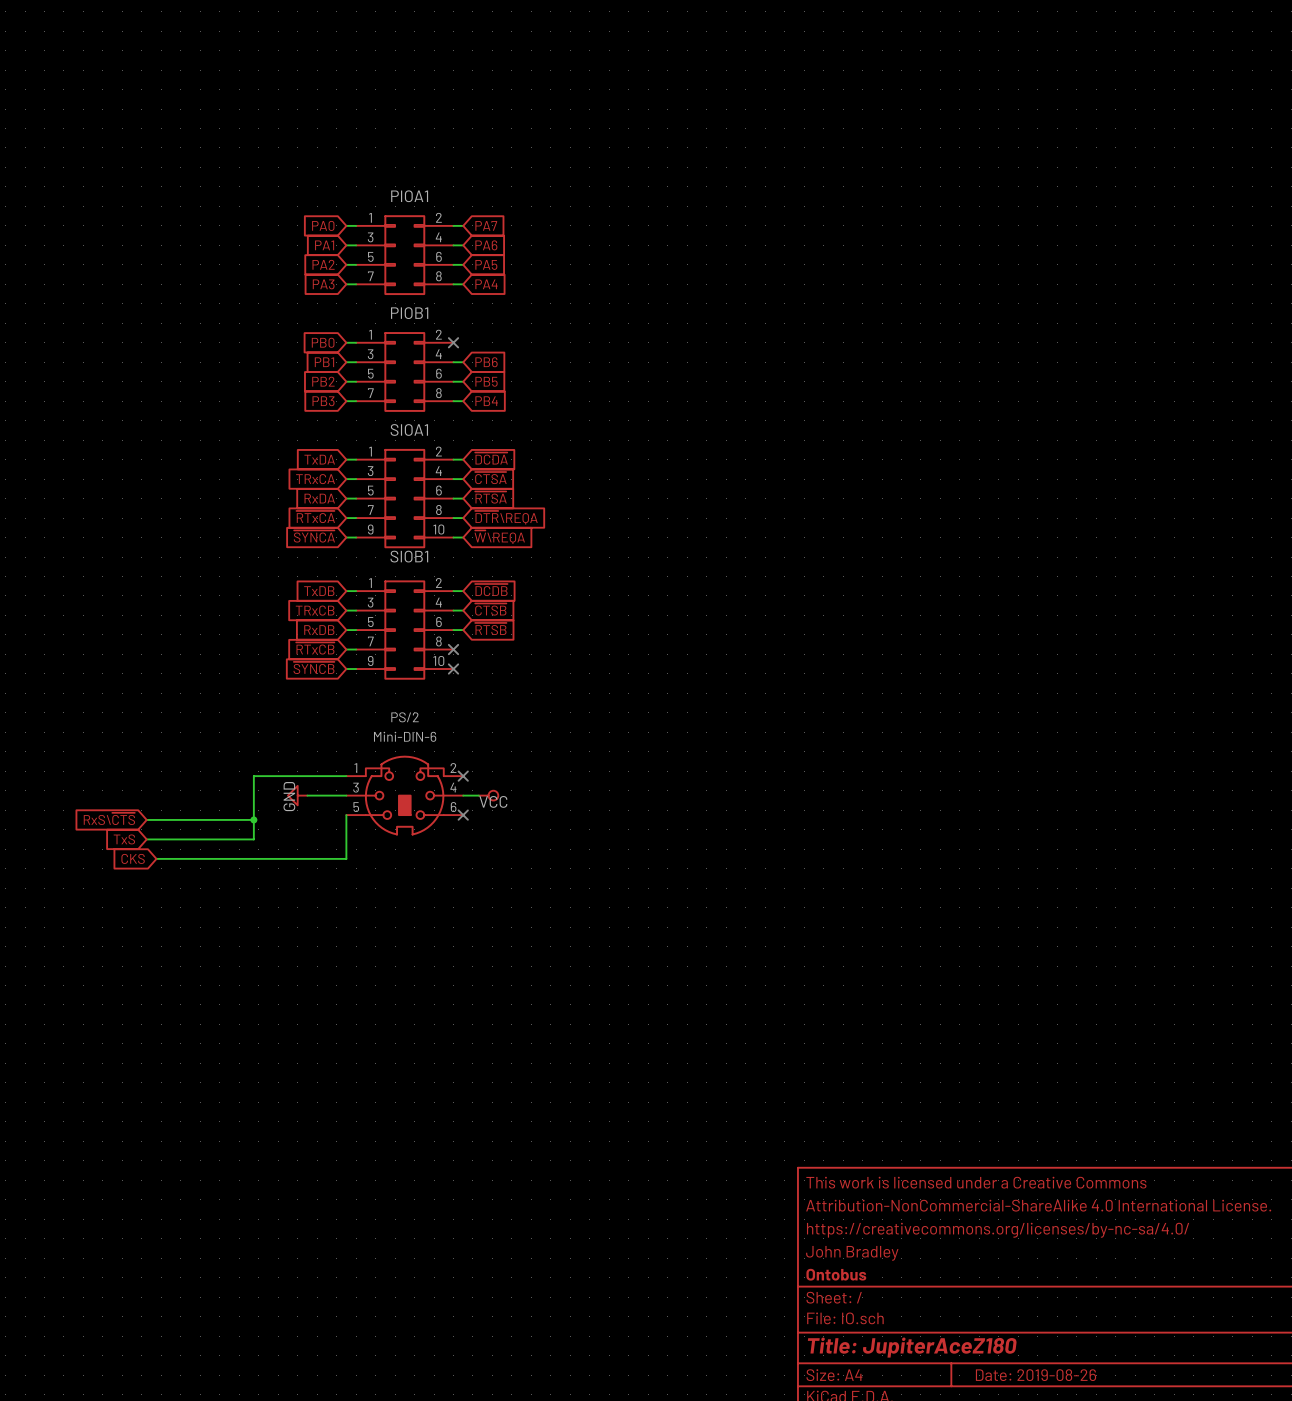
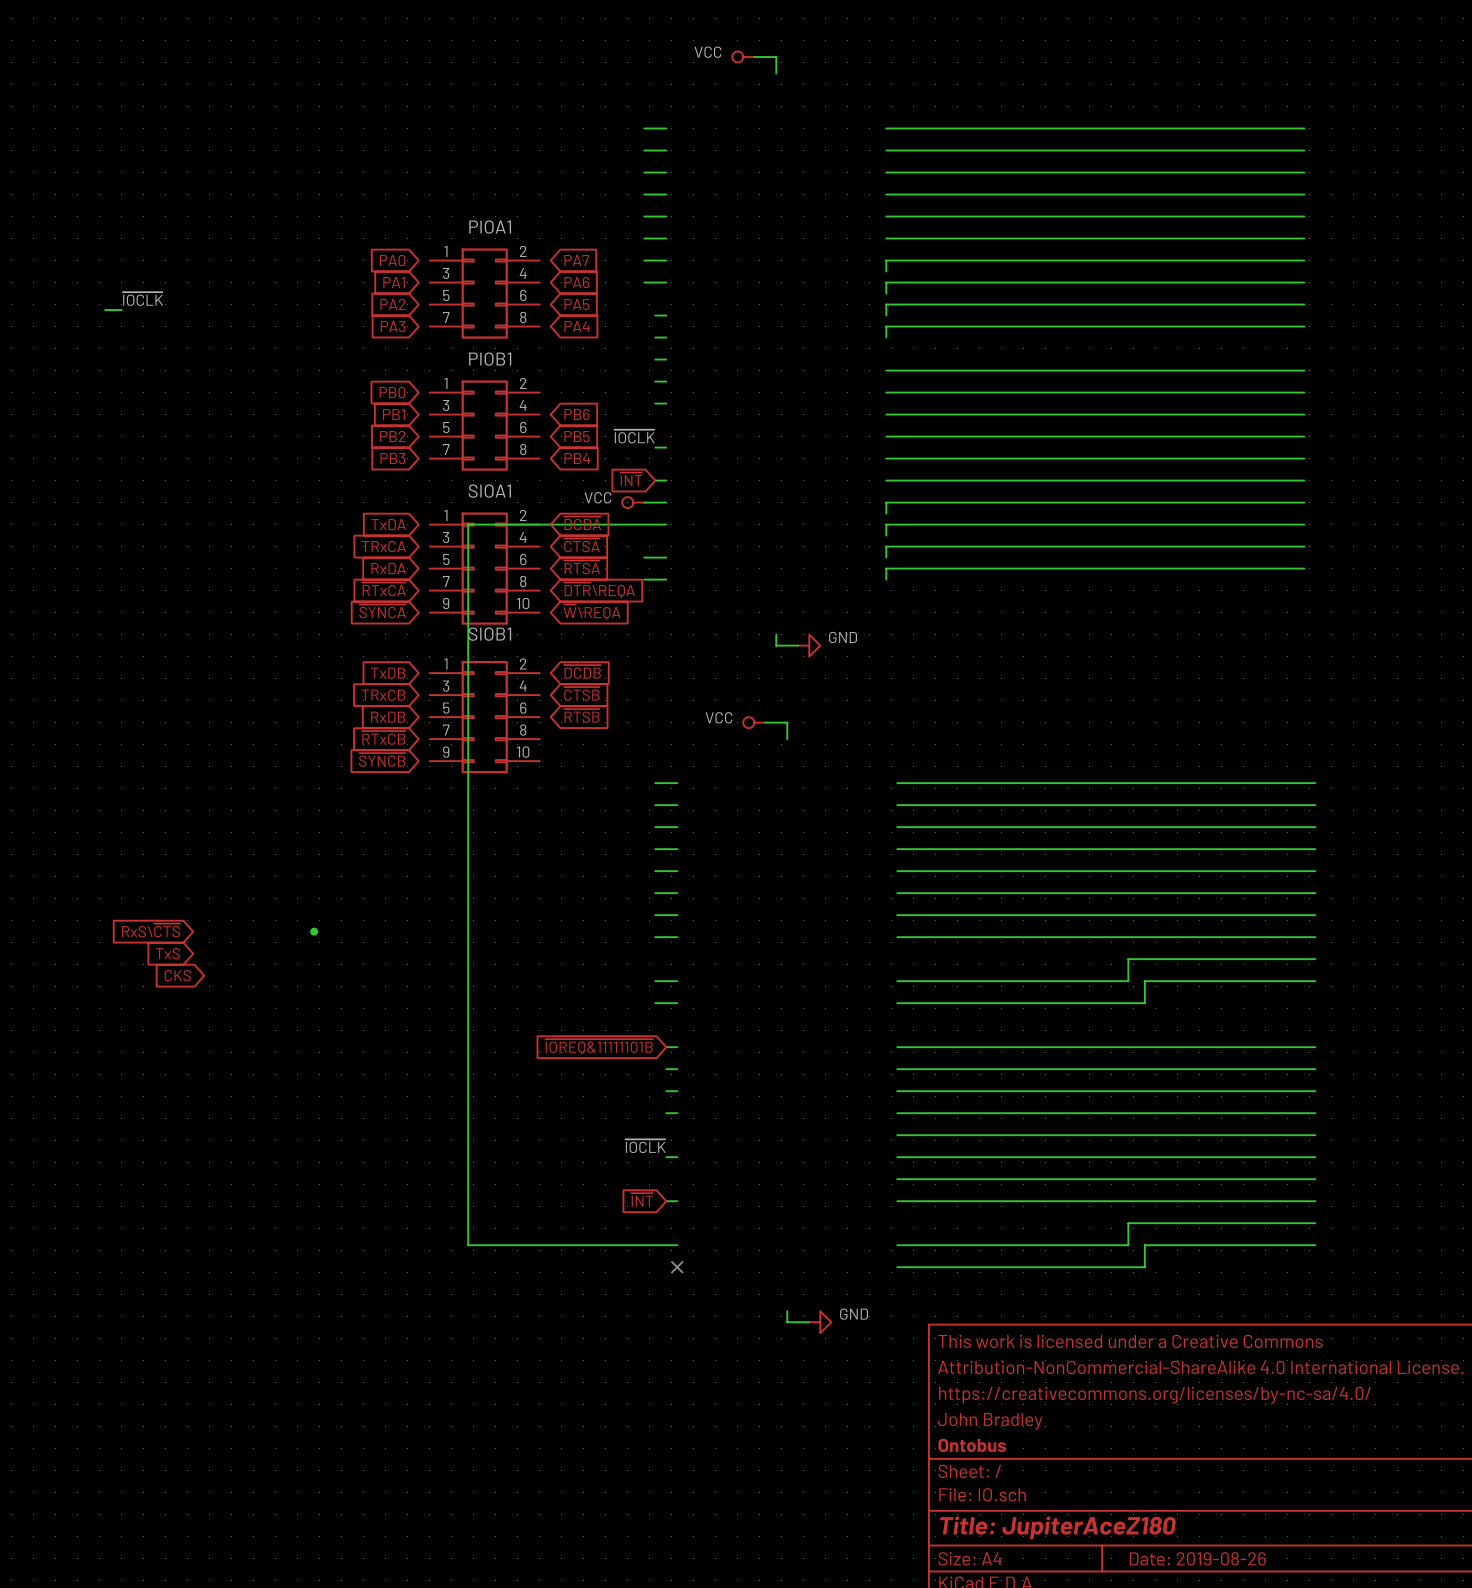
power symbol: none -> VCC (743, 56)
wire: none -> (754, 56) (776, 56) (776, 73)
wire: none -> (644, 128) (666, 128)
wire: none -> (886, 128) (1304, 128)
wire: none -> (644, 150) (666, 150)
wire: none -> (886, 150) (1304, 150)
wire: none -> (644, 172) (666, 172)
wire: none -> (886, 172) (1304, 172)
wire: none -> (644, 194) (666, 194)
wire: none -> (886, 194) (1304, 194)
wire: none -> (644, 216) (666, 216)
wire: none -> (886, 216) (1304, 216)
wire: none -> (644, 238) (666, 238)
wire: none -> (886, 238) (1304, 238)
wire: (346, 225) (356, 225) -> none
wire: (453, 225) (463, 225) -> none
wire: none -> (644, 260) (666, 260)
wire: none -> (1304, 260) (886, 260) (886, 271)
wire: (346, 245) (356, 245) -> none
wire: (453, 245) (463, 245) -> (655, 315) (666, 315)
wire: none -> (644, 282) (666, 282)
wire: none -> (1304, 282) (886, 282) (886, 293)
label: none -> ~{IOCLK} (142, 299)
wire: (346, 264) (356, 264) -> none
wire: (453, 264) (463, 264) -> (655, 337) (666, 337)
wire: none -> (1304, 304) (886, 304) (886, 315)
wire: none -> (105, 310) (121, 310)
wire: (346, 284) (356, 284) -> none
wire: (453, 284) (463, 284) -> (655, 359) (666, 359)
wire: none -> (1304, 326) (886, 326) (886, 337)
wire: none -> (886, 370) (1304, 370)
wire: (346, 342) (356, 342) -> none
no-connect mark: (453, 342) -> none
wire: none -> (886, 392) (1304, 392)
wire: (346, 362) (356, 362) -> none
wire: (453, 362) (463, 362) -> (655, 447) (666, 447)
wire: none -> (886, 414) (1304, 414)
wire: (346, 381) (356, 381) -> none
wire: (453, 381) (463, 381) -> (655, 381) (666, 381)
label: none -> ~{IOCLK} (634, 436)
wire: none -> (886, 436) (1304, 436)
wire: (346, 401) (356, 401) -> none
wire: (453, 401) (463, 401) -> (655, 403) (666, 403)
wire: none -> (886, 458) (1304, 458)
global label: none -> ~{INT} (631, 479)
wire: none -> (886, 480) (1304, 480)
power symbol: none -> VCC (633, 502)
wire: none -> (644, 502) (666, 502)
wire: none -> (1304, 502) (886, 502) (886, 513)
wire: (346, 459) (356, 459) -> none
wire: none -> (539, 524) (468, 524) (468, 1245) (677, 1245)
wire: none -> (550, 524) (666, 524)
wire: none -> (1304, 524) (886, 524) (886, 535)
wire: (346, 479) (356, 479) -> none
wire: (453, 479) (463, 479) -> (655, 480) (666, 480)
wire: none -> (1304, 546) (886, 546) (886, 557)
wire: none -> (644, 557) (666, 557)
wire: (346, 498) (356, 498) -> none
wire: (453, 498) (463, 498) -> none
wire: none -> (1304, 568) (886, 568) (886, 579)
wire: none -> (644, 579) (666, 579)
wire: (346, 518) (356, 518) -> none
wire: (453, 518) (463, 518) -> none
wire: (346, 537) (356, 537) -> none
wire: (453, 537) (463, 537) -> none
wire: none -> (776, 634) (776, 645) (798, 645)
power symbol: none -> GND (809, 645)
wire: (346, 591) (356, 591) -> none
wire: (453, 591) (463, 591) -> none
wire: (346, 610) (356, 610) -> none
wire: (453, 610) (463, 610) -> none
wire: (346, 630) (356, 630) -> none
wire: (453, 630) (463, 630) -> none
power symbol: none -> VCC (754, 722)
wire: none -> (765, 722) (787, 722) (787, 739)
wire: (346, 649) (356, 649) -> none
no-connect mark: (453, 649) -> none
wire: (346, 669) (356, 669) -> none
no-connect mark: (453, 669) -> none
wire: none -> (655, 783) (677, 783)
wire: none -> (897, 783) (1315, 783)
wire: none -> (655, 805) (677, 805)
wire: none -> (897, 805) (1315, 805)
wire: none -> (655, 827) (677, 827)
wire: none -> (897, 827) (1315, 827)
wire: none -> (655, 849) (677, 849)
wire: none -> (897, 849) (1315, 849)
wire: none -> (655, 871) (677, 871)
wire: none -> (897, 871) (1315, 871)
wire: (346, 776) (253, 776) (253, 819) -> none
no-connect mark: (463, 776) -> none
wire: none -> (655, 893) (677, 893)
wire: none -> (897, 893) (1315, 893)
power symbol: GND (297, 795) -> none
wire: (307, 795) (346, 795) -> none
PS/2: Mini-DIN-6 (404, 795) -> none
wire: (463, 795) (478, 795) -> none
power symbol: VCC (488, 795) -> none
wire: none -> (655, 915) (677, 915)
wire: none -> (897, 915) (1315, 915)
wire: (346, 815) (346, 858) (156, 858) -> none
no-connect mark: (463, 815) -> none
wire: (146, 819) (253, 819) -> none
wire: (253, 819) (253, 839) (146, 839) -> none
wire: none -> (655, 937) (677, 937)
wire: none -> (897, 937) (1315, 937)
wire: none -> (1315, 959) (1128, 959) (1128, 981) (897, 981)
wire: none -> (655, 981) (677, 981)
wire: none -> (1315, 981) (1144, 981) (1144, 1003) (897, 1003)
wire: none -> (655, 1003) (677, 1003)
global label: none -> ~{IOREQ&11111101B} (599, 1046)
wire: none -> (666, 1047) (677, 1047)
wire: none -> (897, 1047) (1315, 1047)
wire: none -> (666, 1069) (677, 1069)
wire: none -> (897, 1069) (1315, 1069)
wire: none -> (666, 1091) (677, 1091)
wire: none -> (897, 1091) (1315, 1091)
wire: none -> (666, 1113) (677, 1113)
wire: none -> (897, 1113) (1315, 1113)
wire: none -> (897, 1135) (1315, 1135)
label: none -> ~{IOCLK} (645, 1146)
wire: none -> (666, 1157) (677, 1157)
wire: none -> (897, 1157) (1315, 1157)
wire: none -> (897, 1179) (1315, 1179)
global label: none -> ~{INT} (642, 1199)
wire: none -> (666, 1201) (677, 1201)
wire: none -> (897, 1201) (1315, 1201)
wire: none -> (1315, 1223) (1128, 1223) (1128, 1245) (897, 1245)
wire: none -> (1315, 1245) (1144, 1245) (1144, 1267) (897, 1267)
no-connect mark: none -> (677, 1267)
wire: none -> (787, 1311) (787, 1322) (809, 1322)
power symbol: none -> GND (820, 1322)

